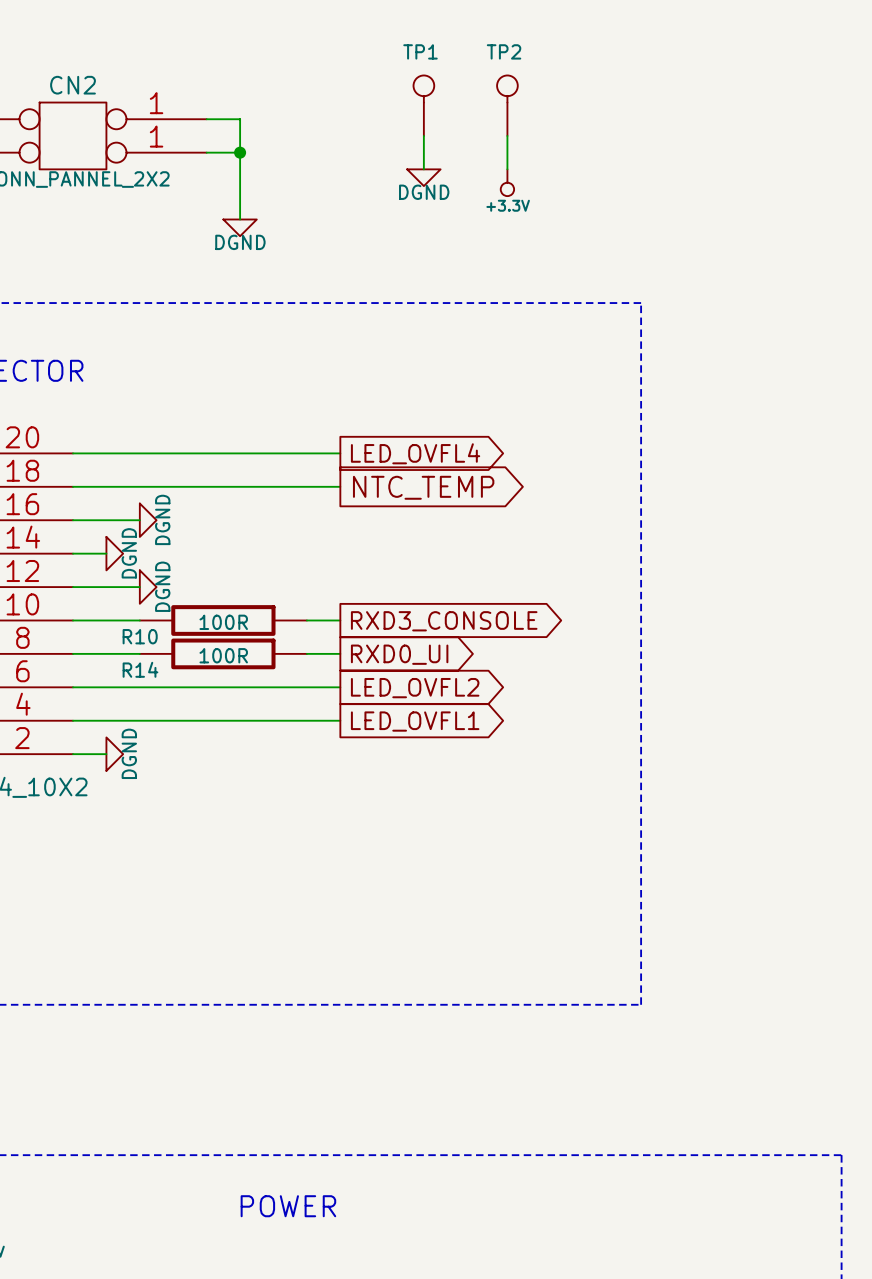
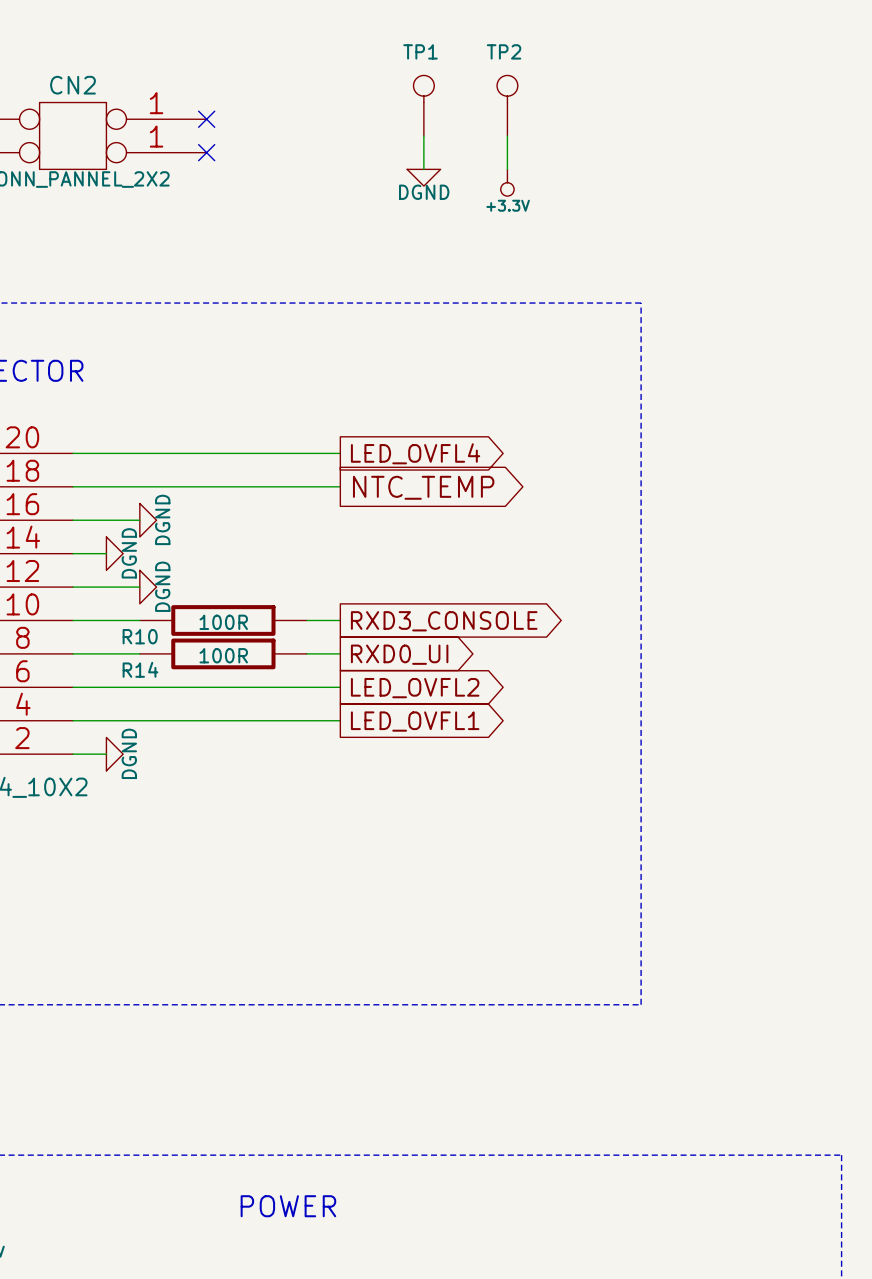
wire: (206, 119) (240, 119) (240, 219) -> none
no-connect mark: none -> (206, 119)
wire: (206, 152) (240, 152) -> none
no-connect mark: none -> (206, 152)
junction: (240, 152) -> none
power symbol: DGND (240, 227) -> none

